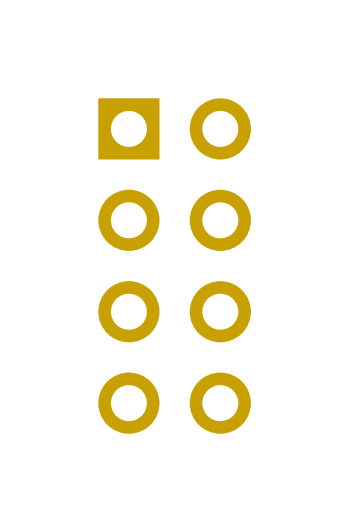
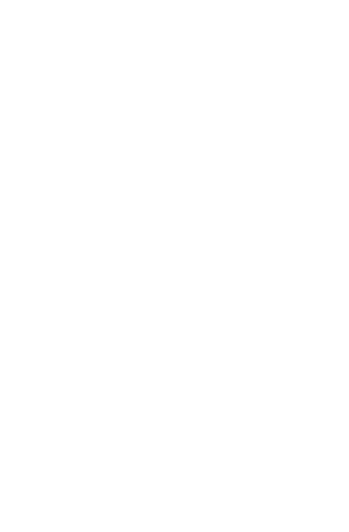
part: (174, 266) -> none

